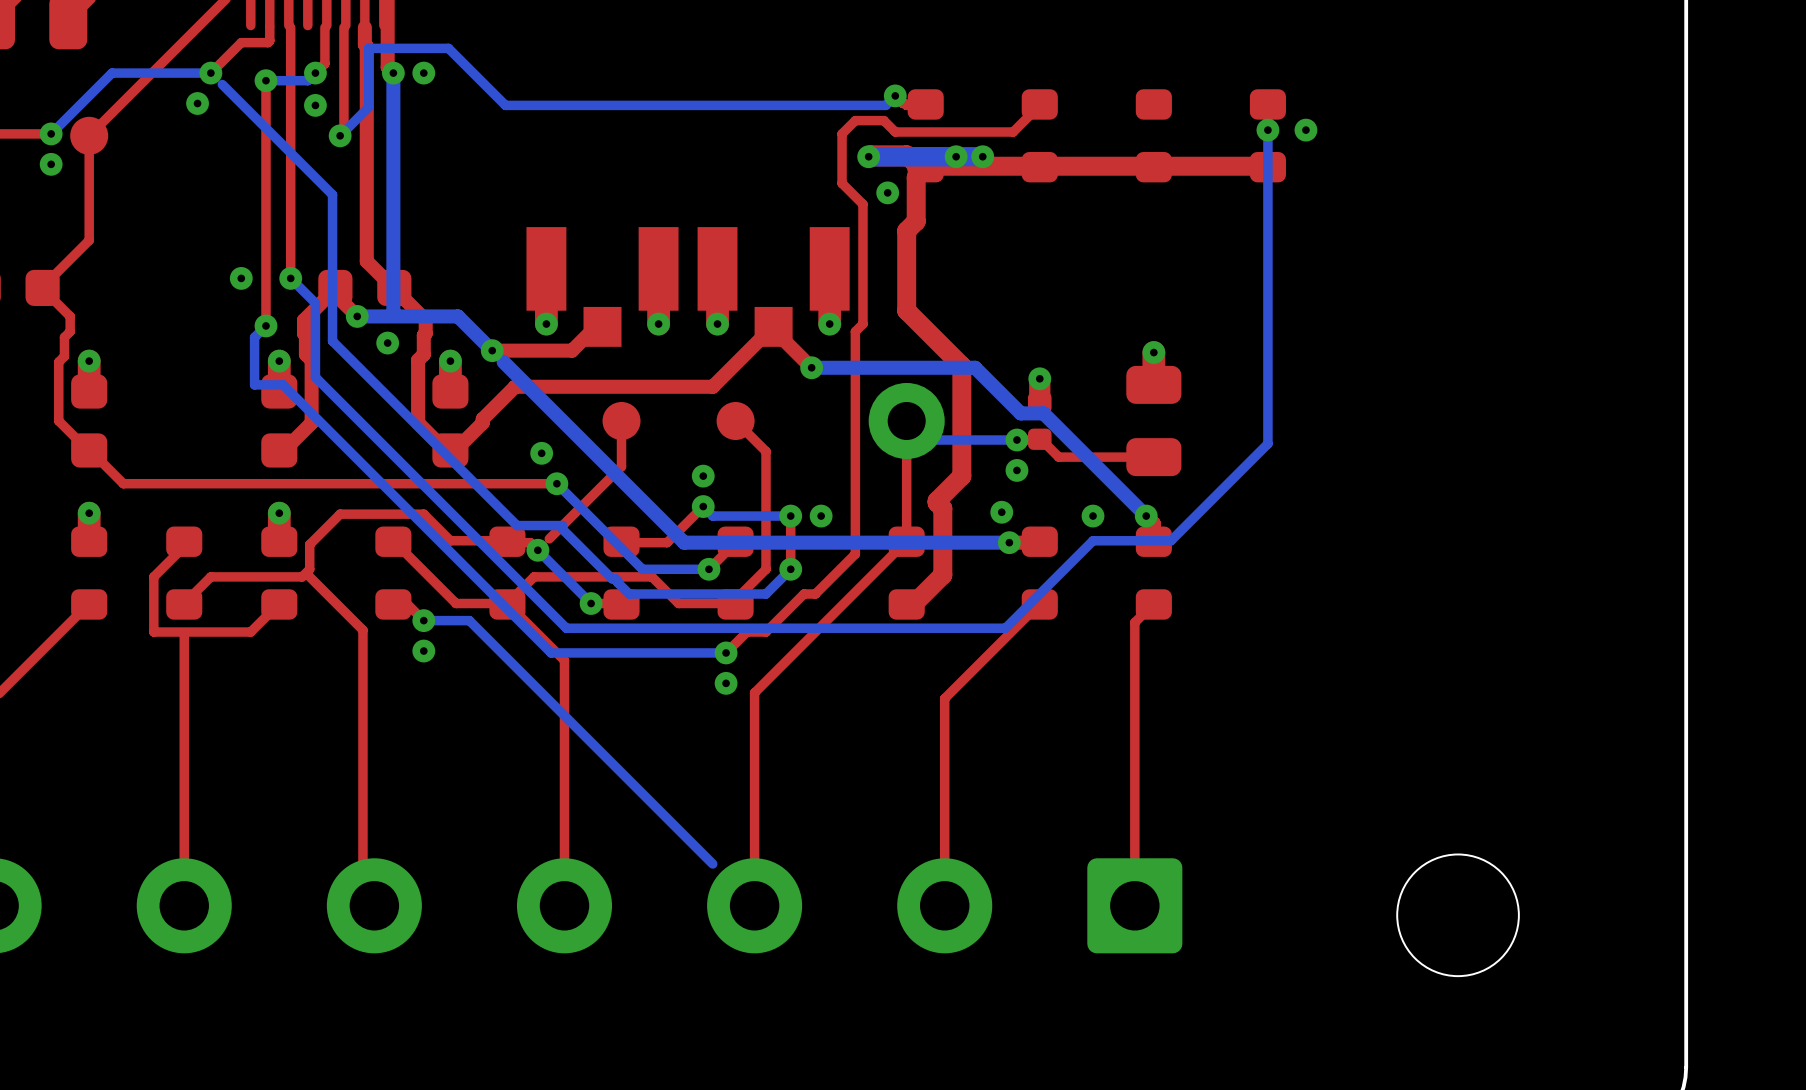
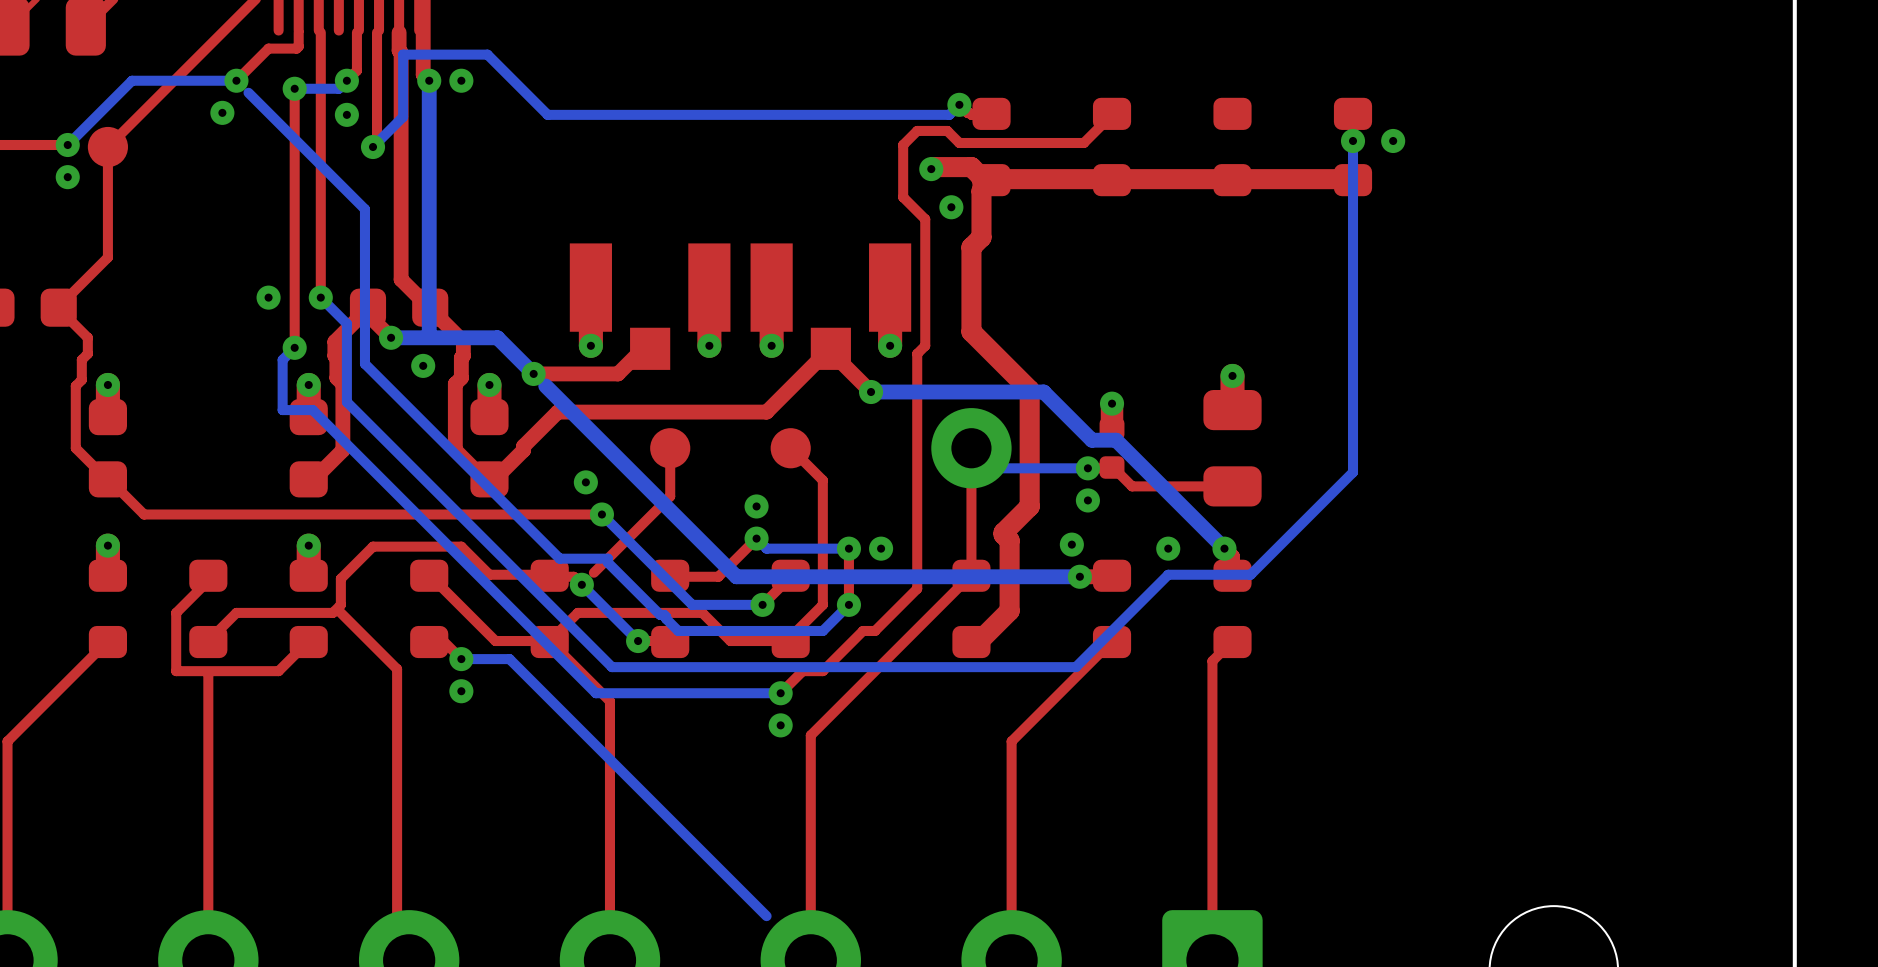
via: (956, 156) -> none
bottom track: (982, 156) (868, 156) -> none
via: (982, 156) -> none

